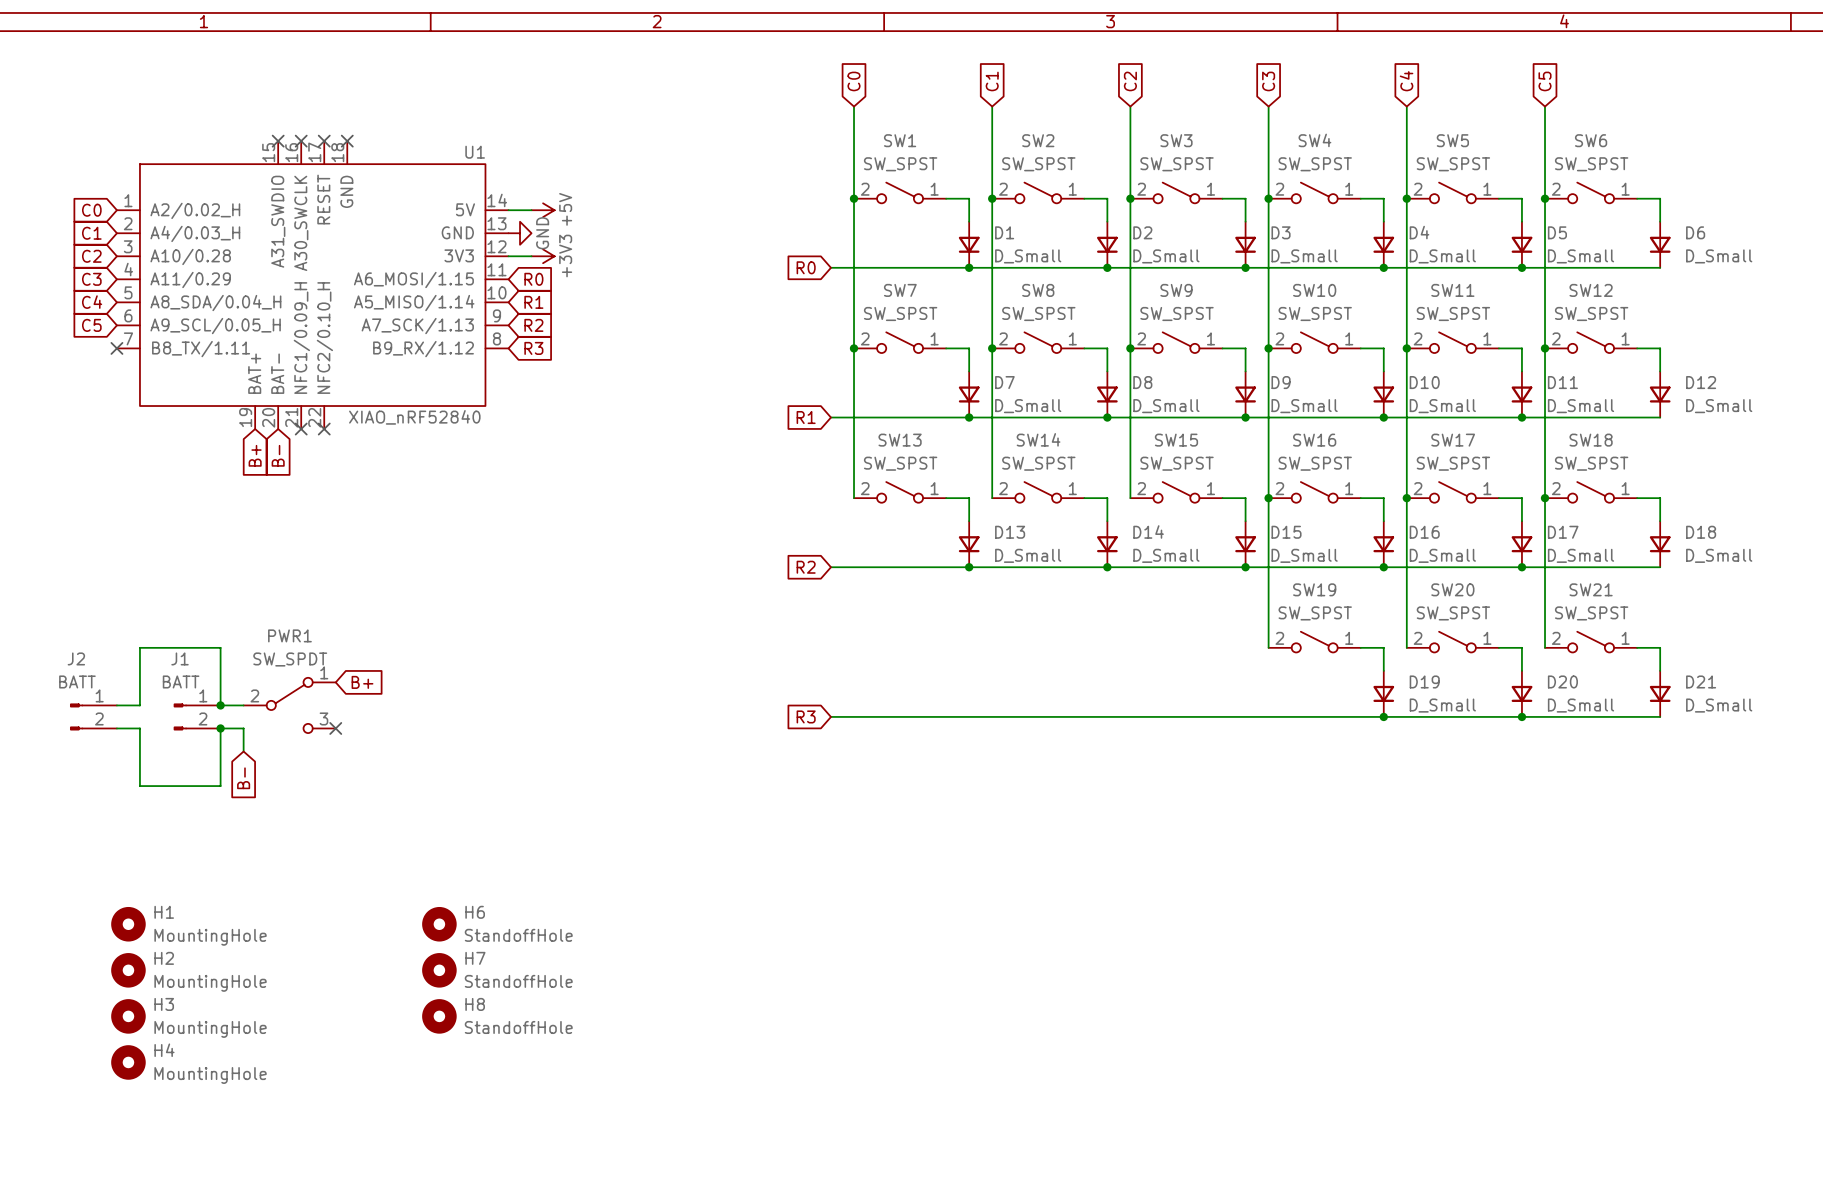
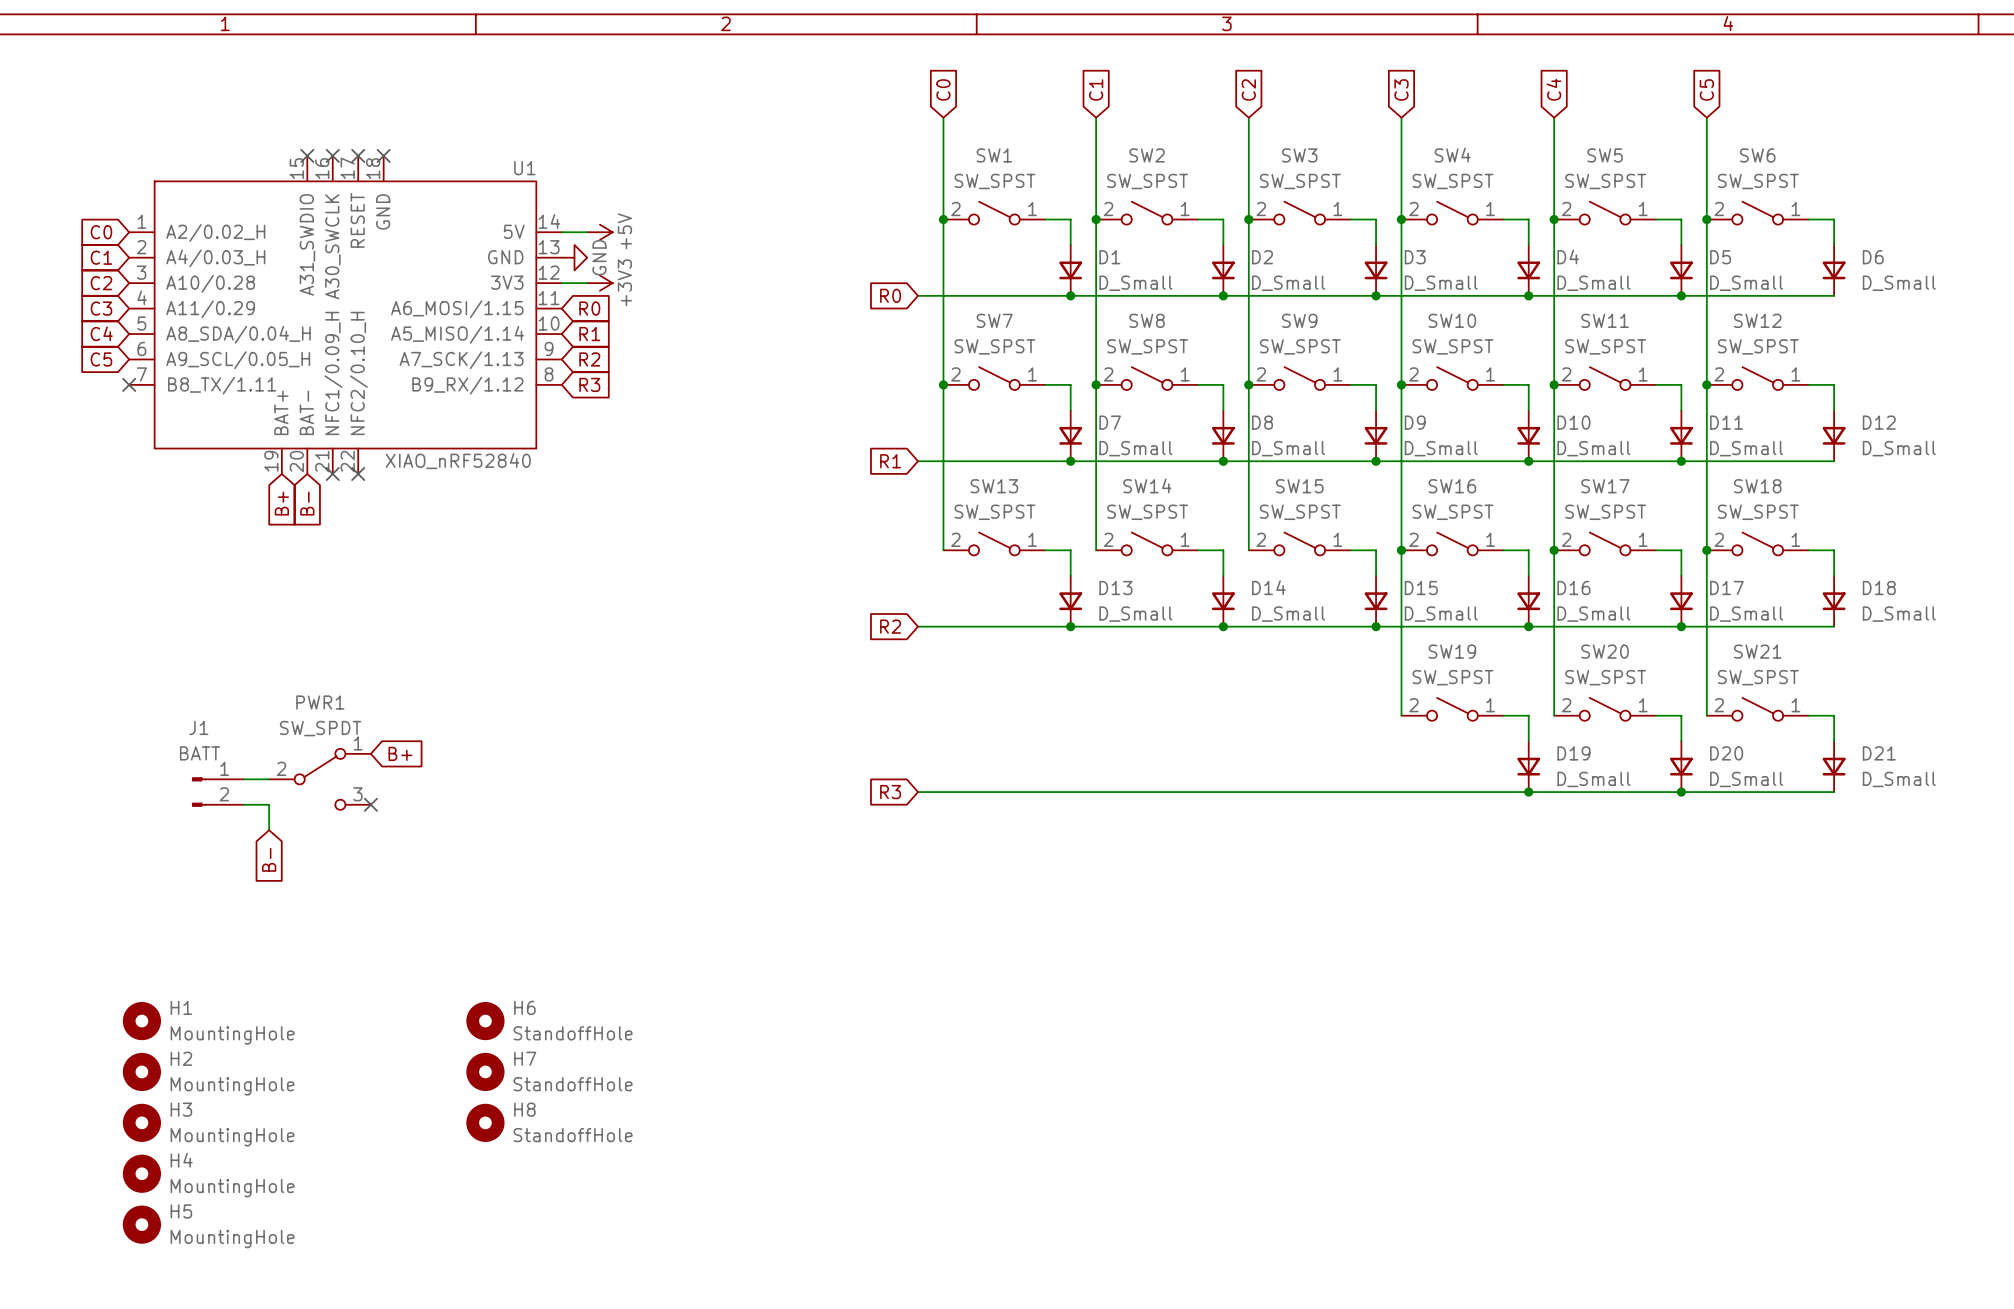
wire: (116, 705) (139, 705) (139, 647) (220, 647) (220, 705) -> none
junction: (220, 705) -> none
J2: BATT (93, 716) -> none
wire: (116, 728) (139, 728) (139, 786) (220, 786) (220, 728) -> none
junction: (220, 728) -> none
H5: none -> MountingHole (141, 1224)

